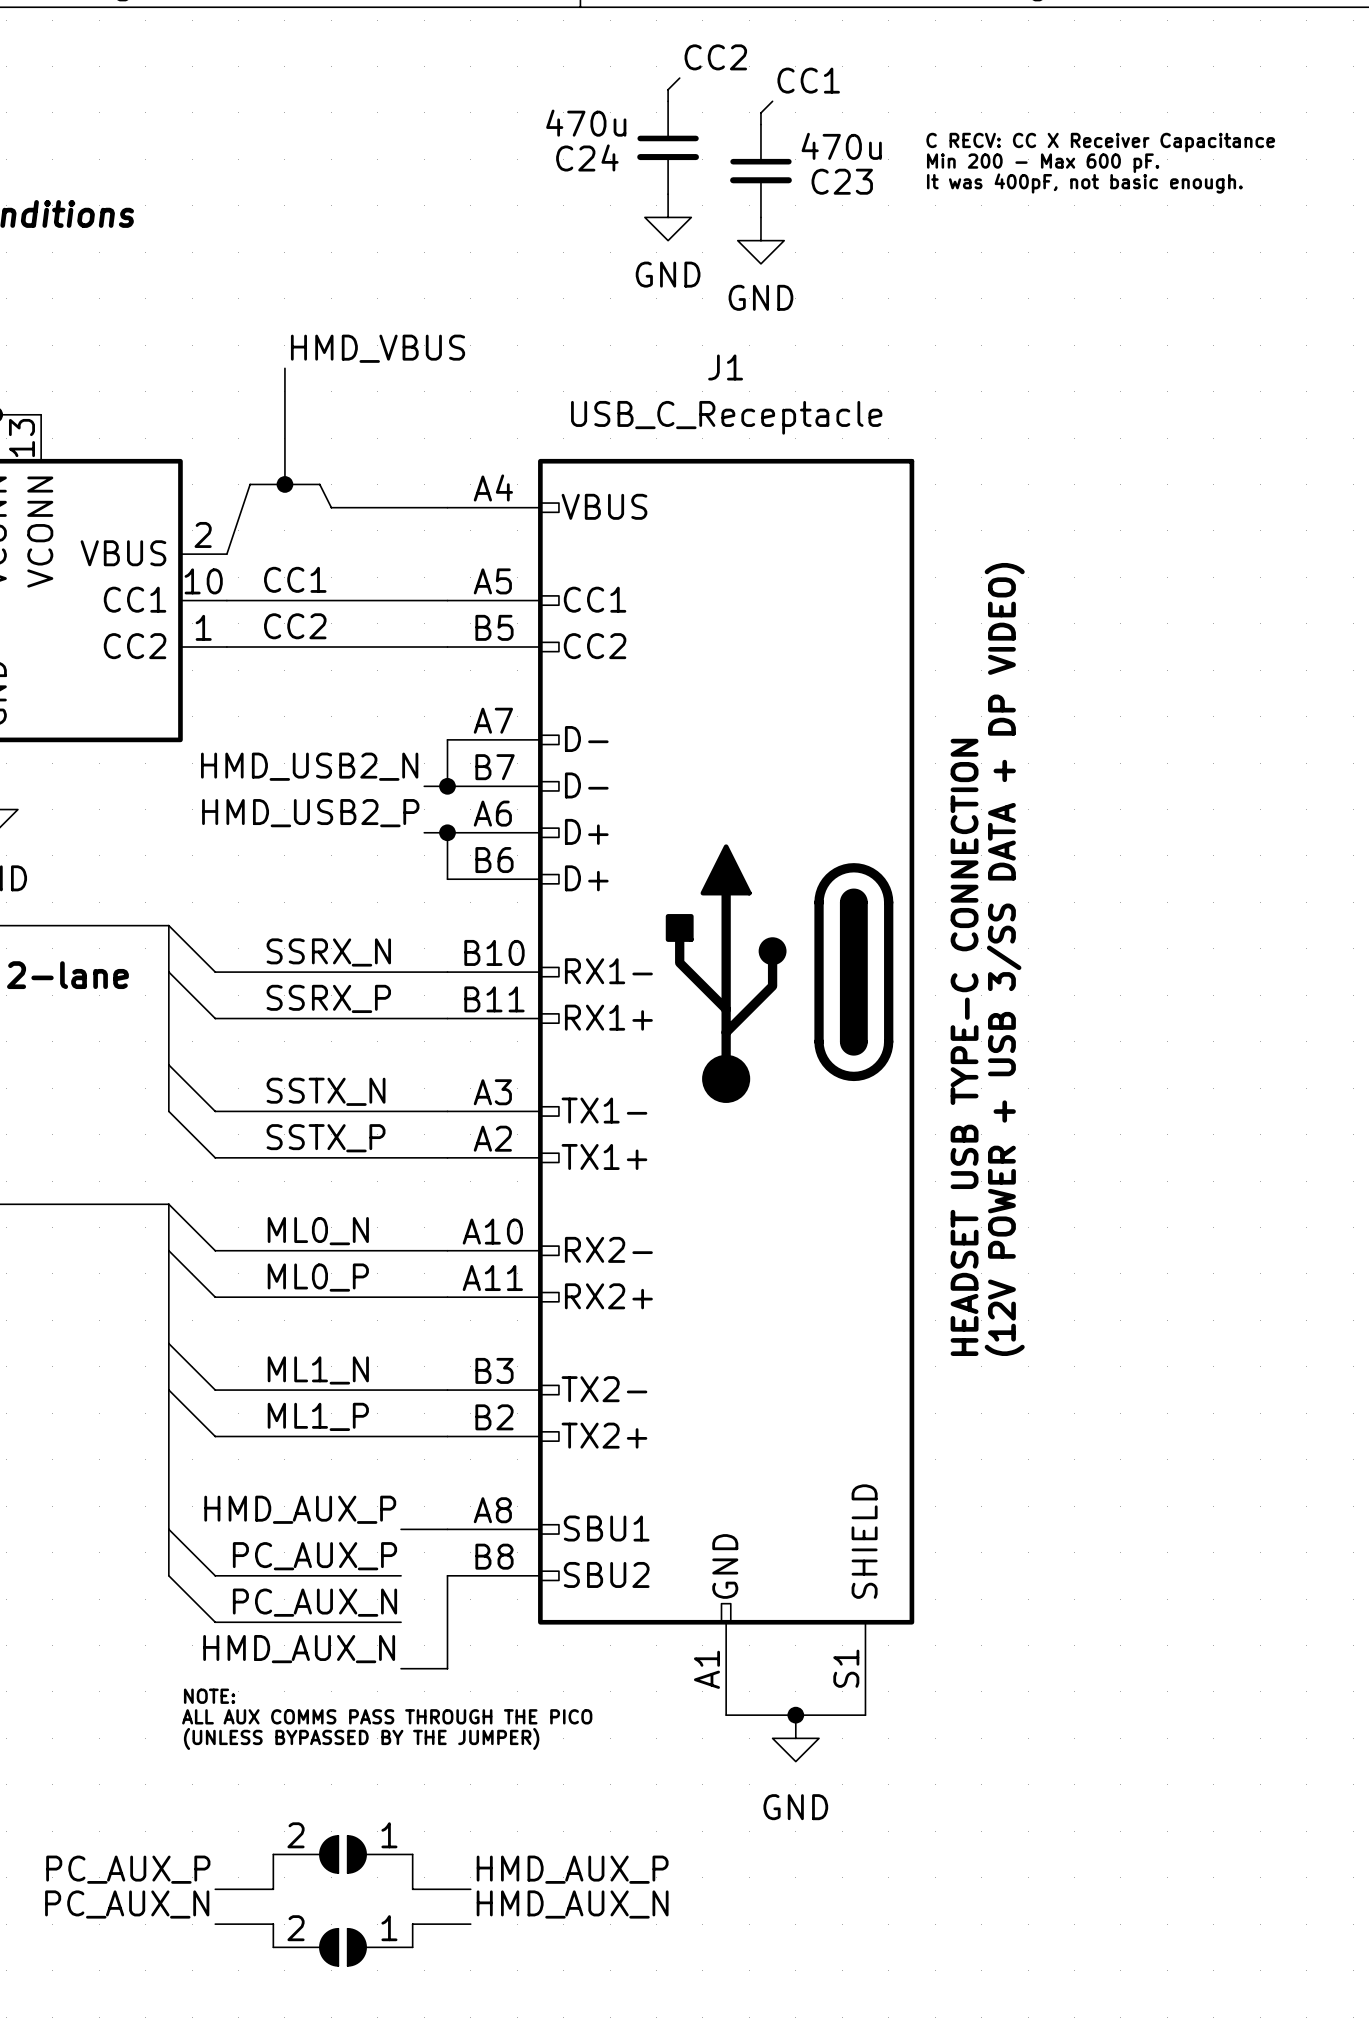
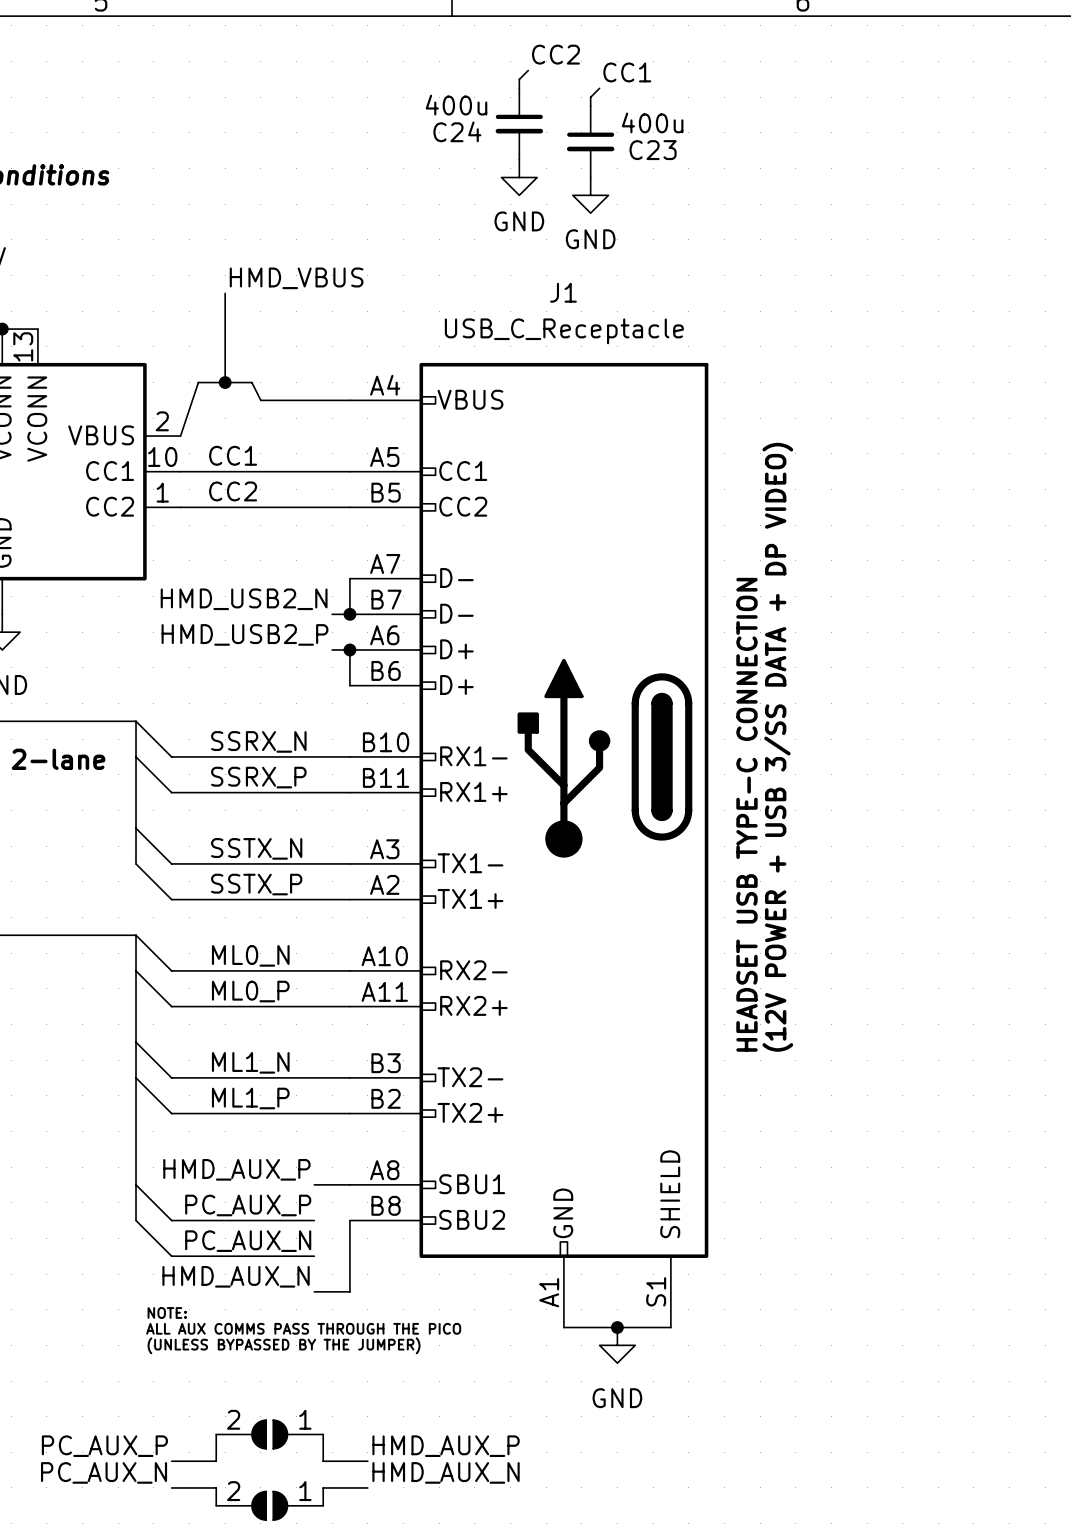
C24 value: 470u (586, 123) -> 400u (456, 105)
text: C RECV: CC X Receiver Capacitance (1100, 142) -> none
C23 value: 470u (841, 146) -> 400u (652, 122)
text: Min 200 − Max 600 pF. (1043, 163) -> none
text: It was 400pF, not basic enough. (1084, 183) -> none

